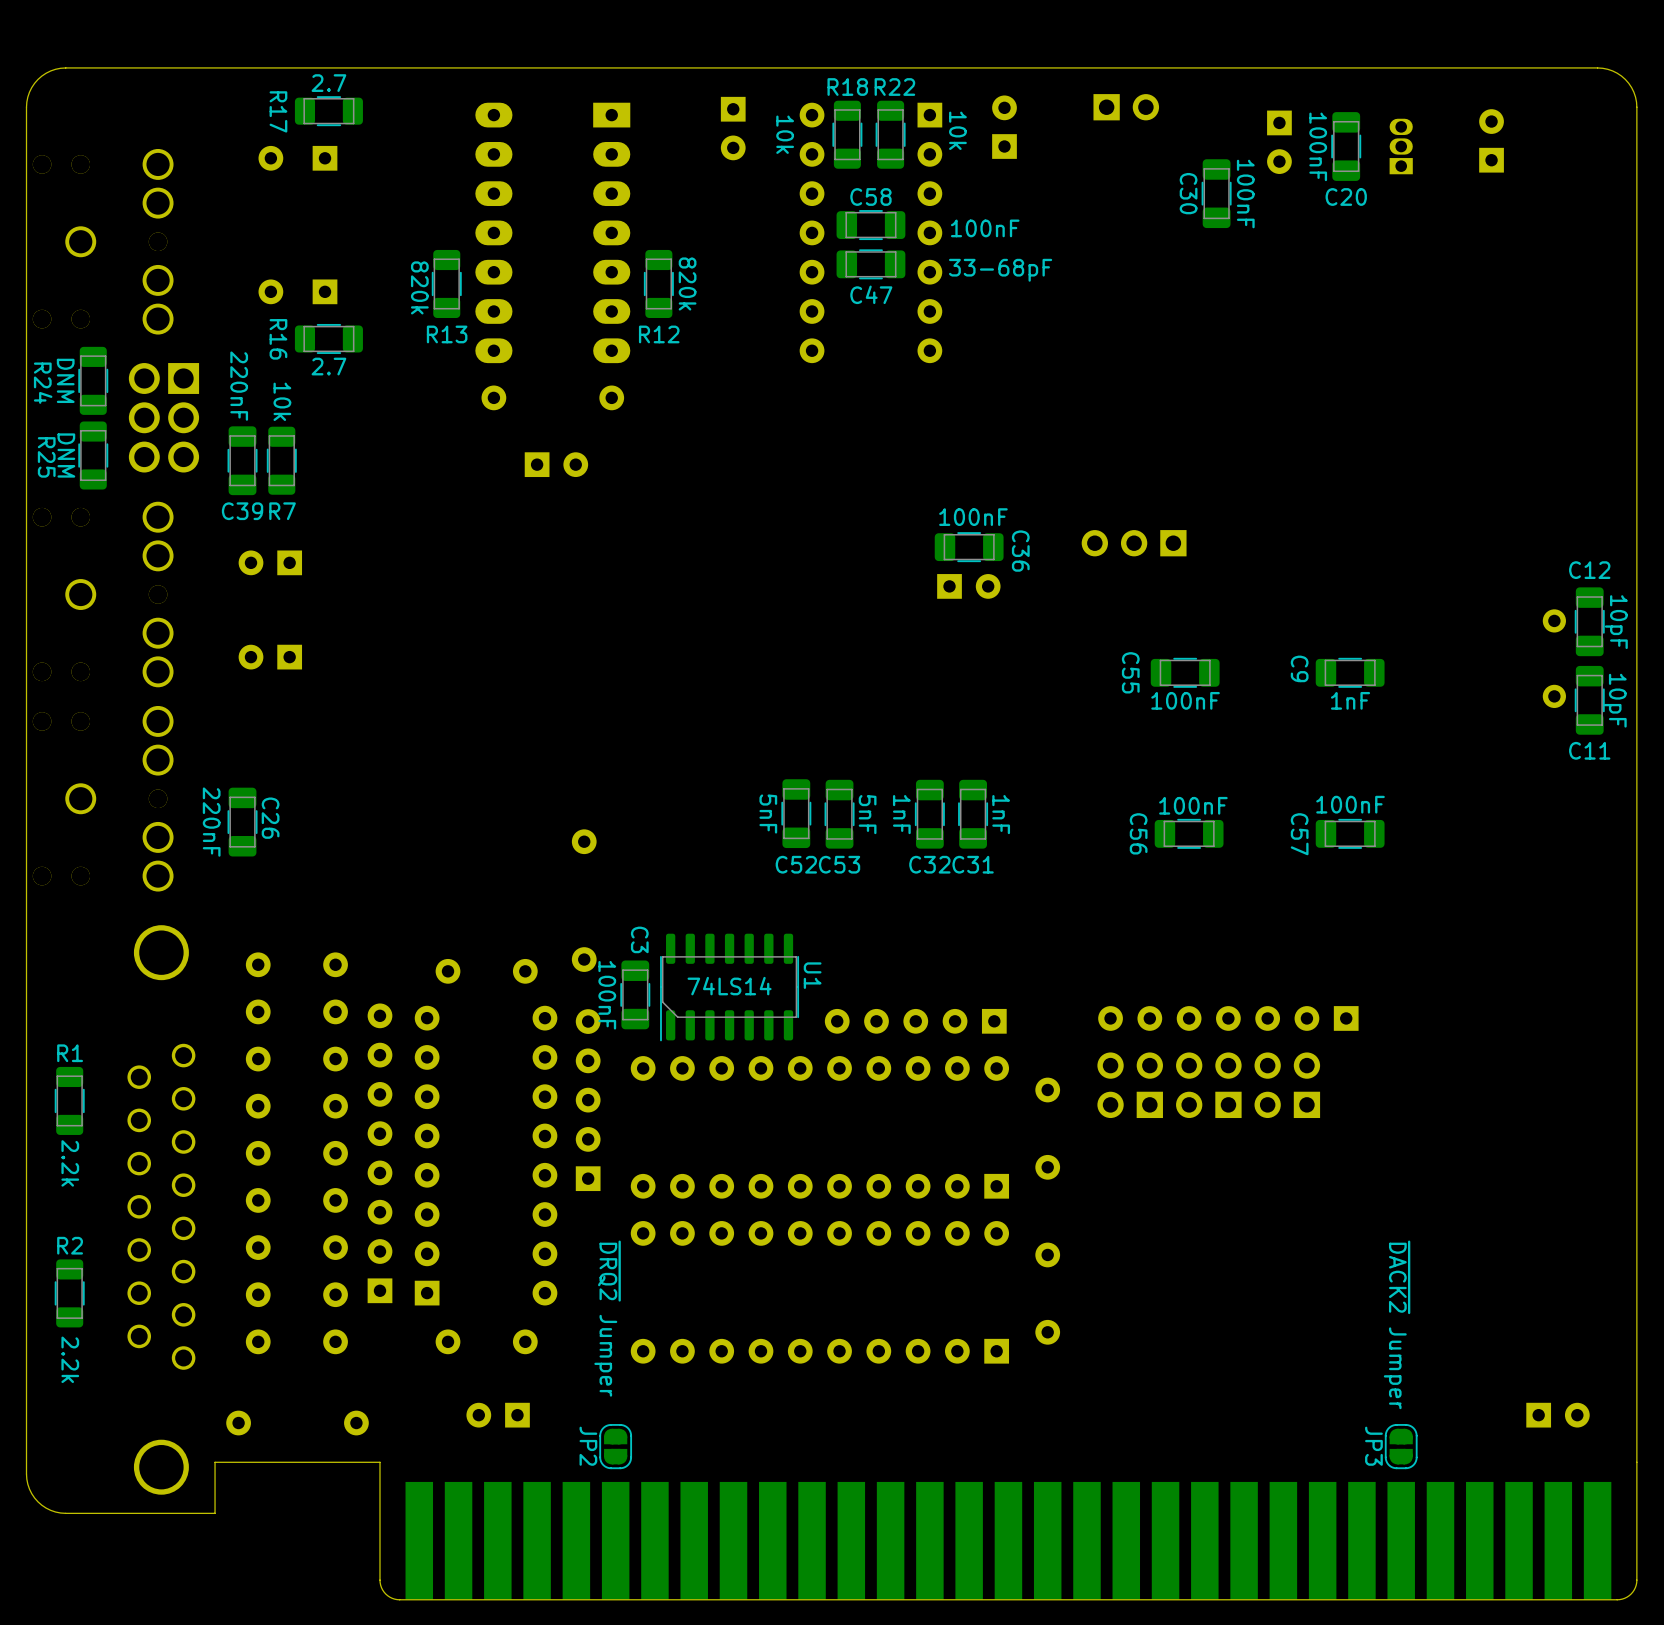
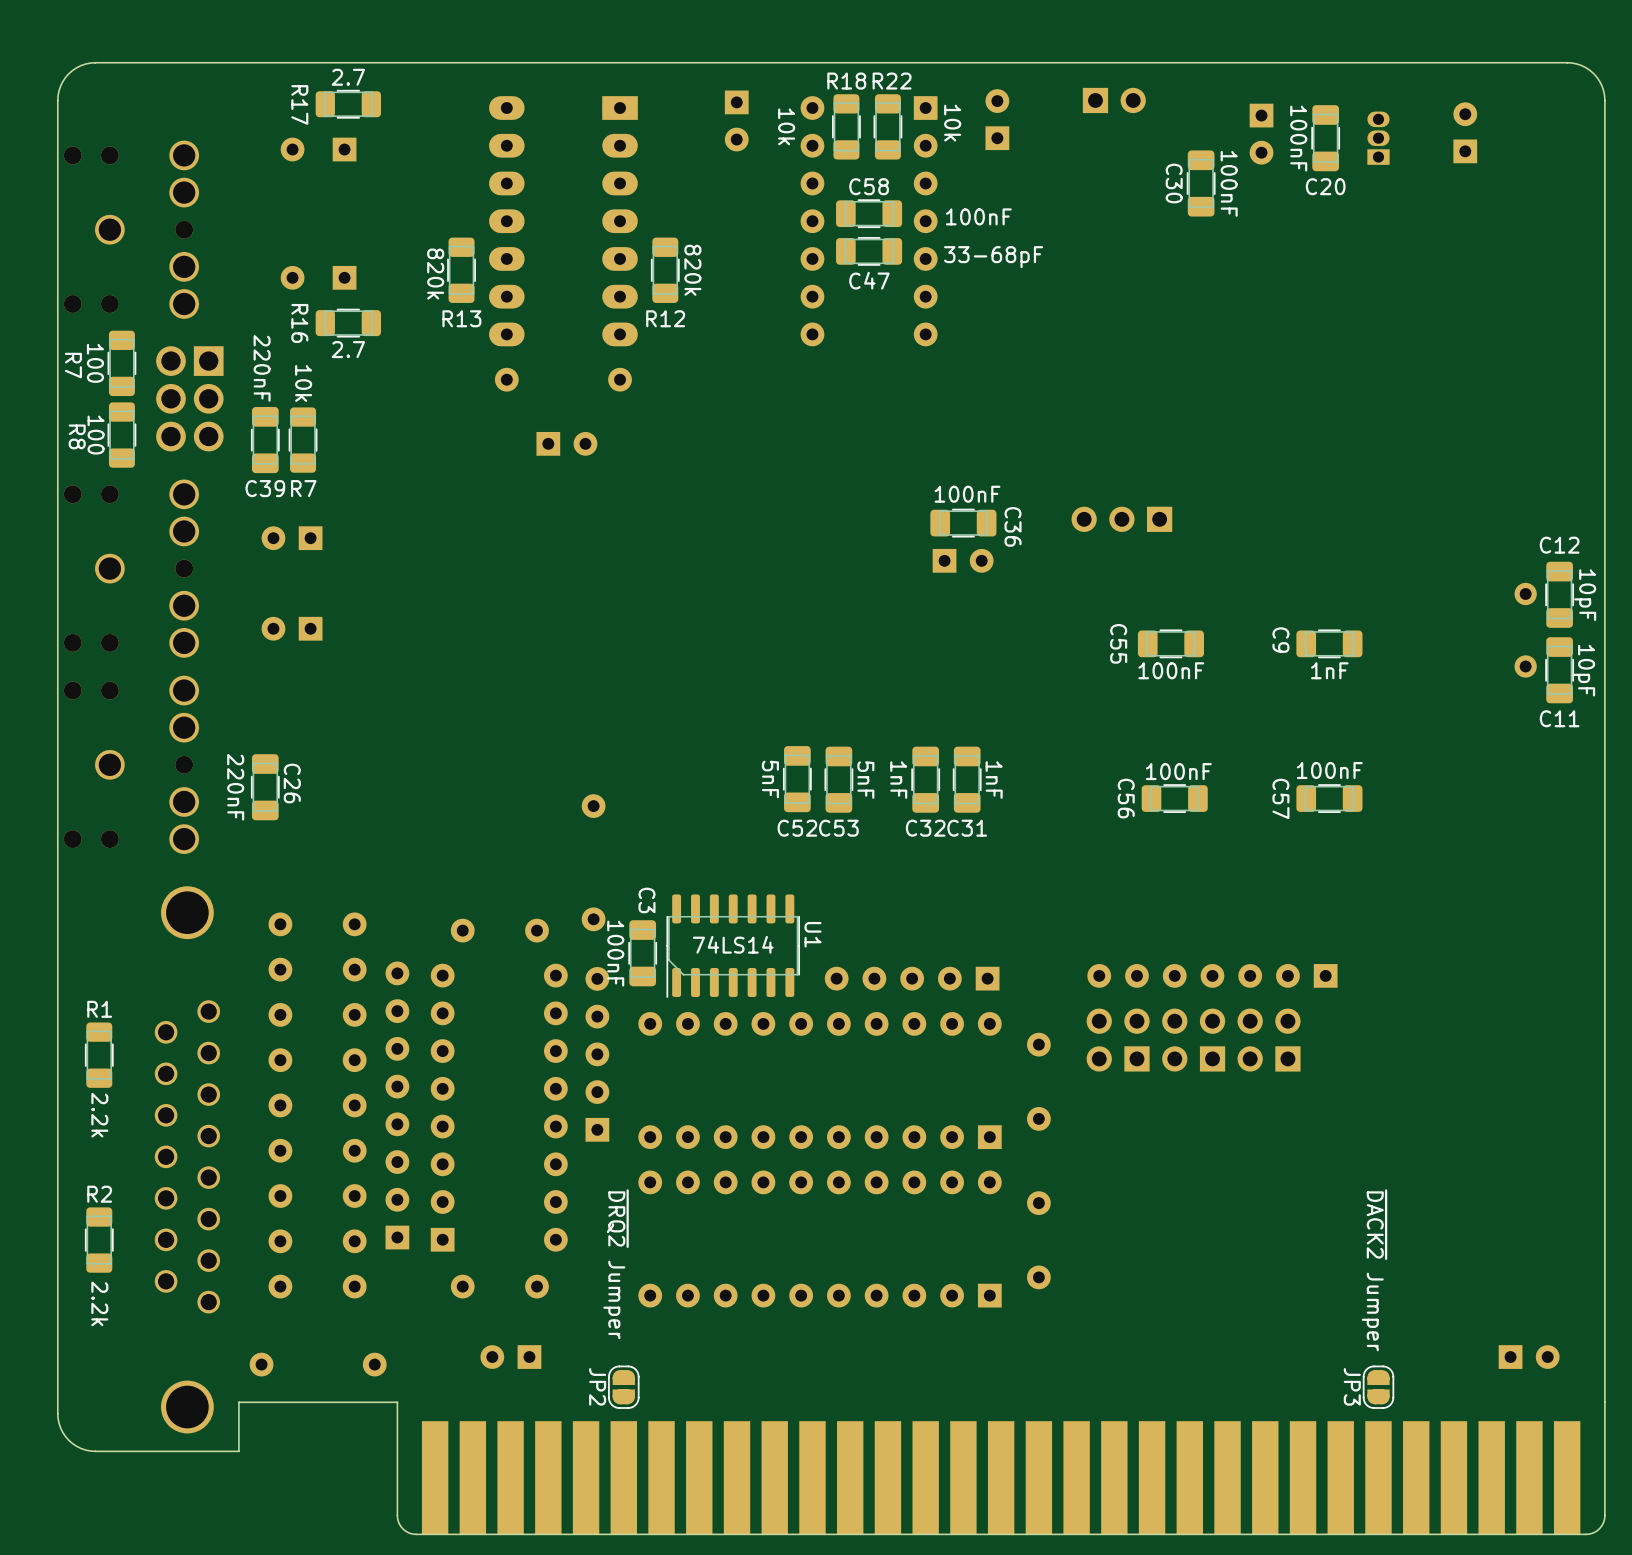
R24 value: DNM (65, 380) -> 100 (95, 363)
R24 name: R24 (43, 383) -> R7 (73, 365)
R25 value: DNM (66, 455) -> 100 (96, 435)
R25 name: R25 (46, 457) -> R8 (77, 436)

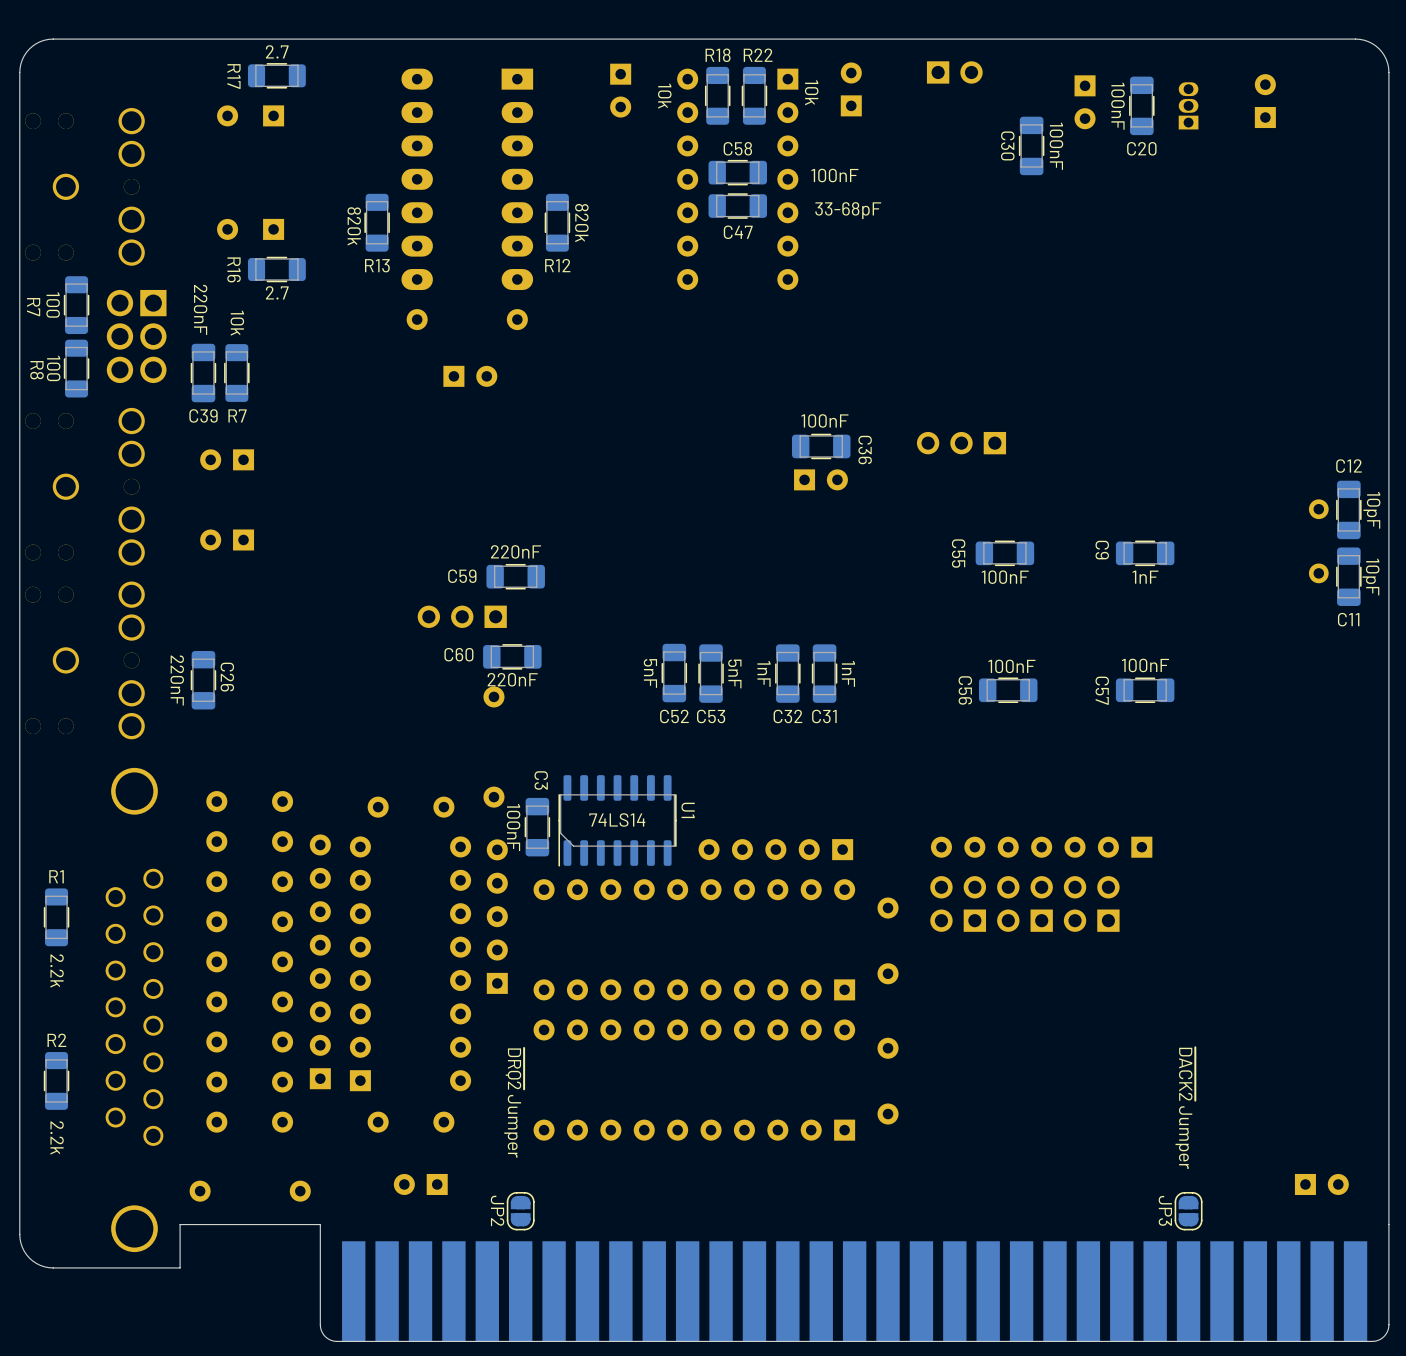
C59: none -> 220nF (515, 576)
part: none -> (462, 616)
C60: none -> 220nF (512, 656)

